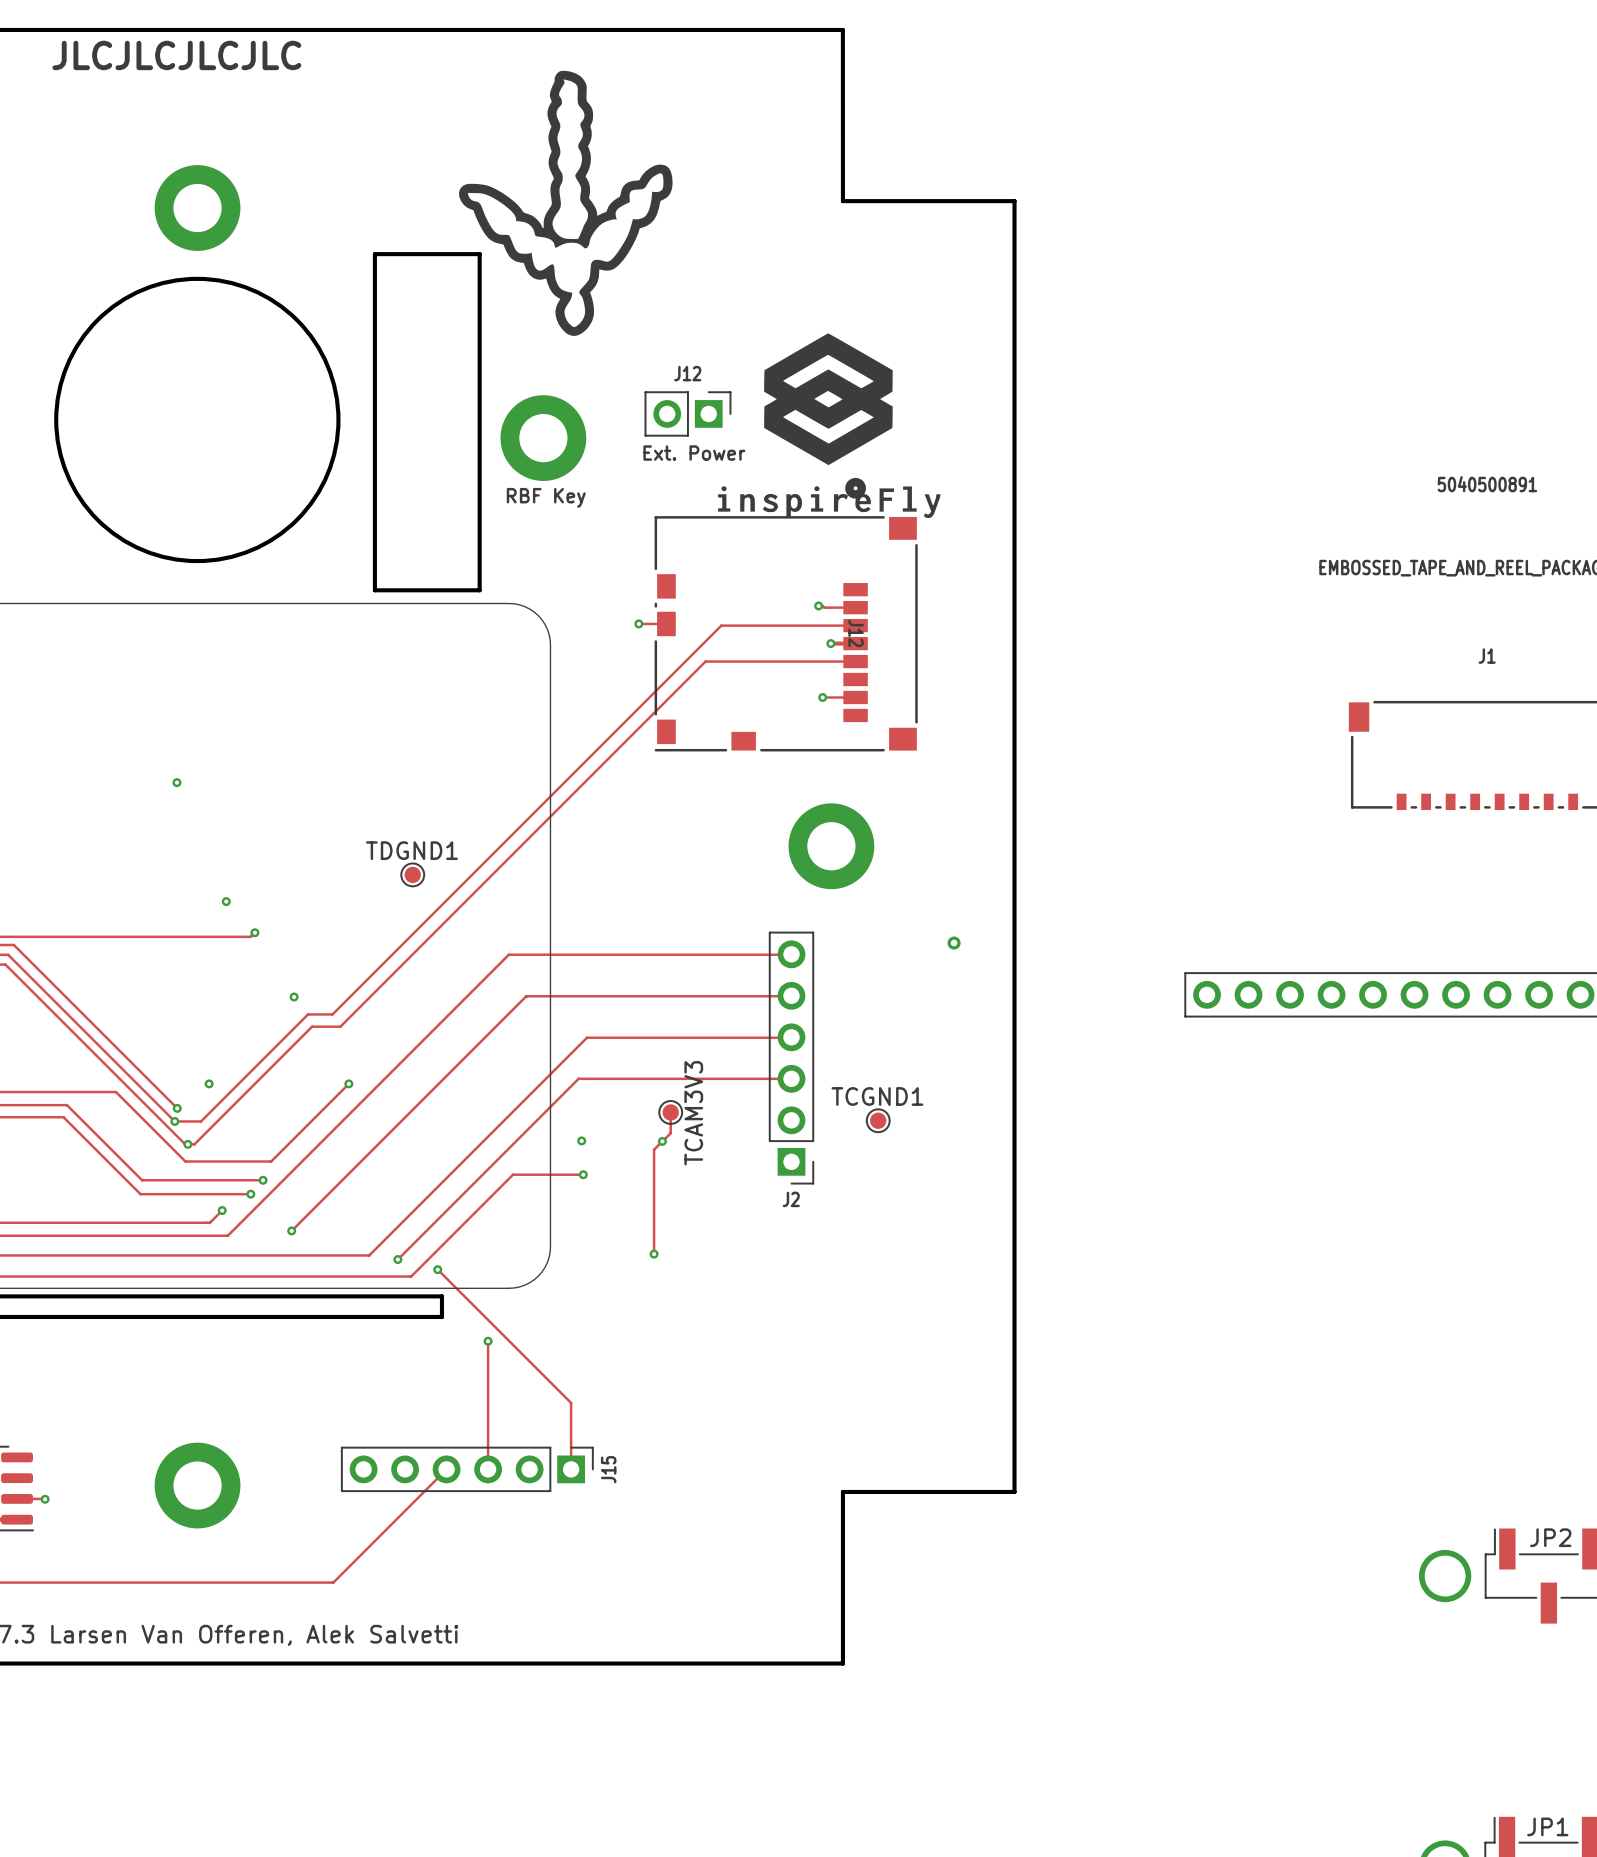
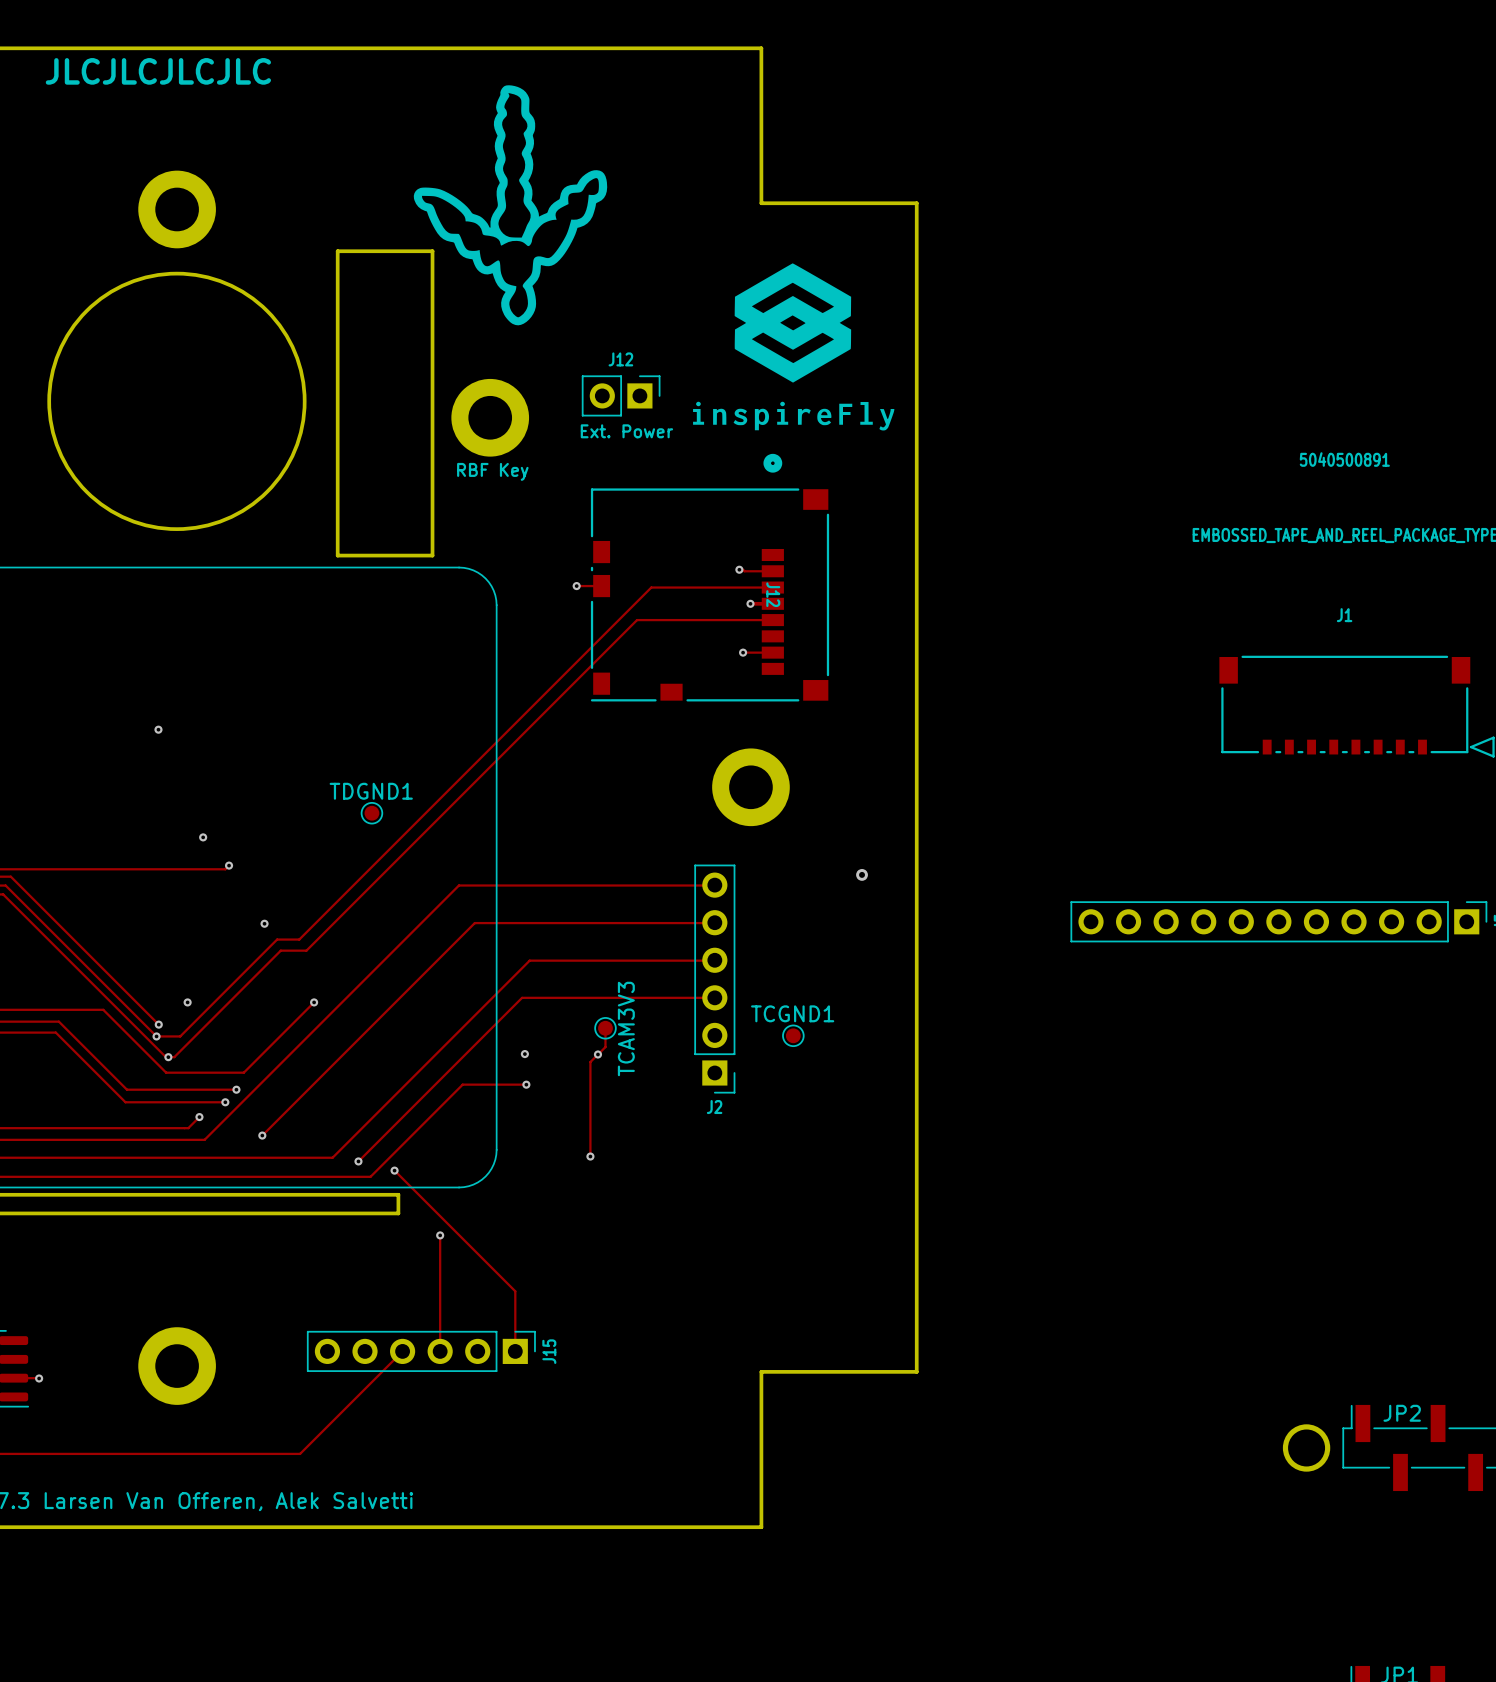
drawing position: (829, 425) -> (793, 346)

